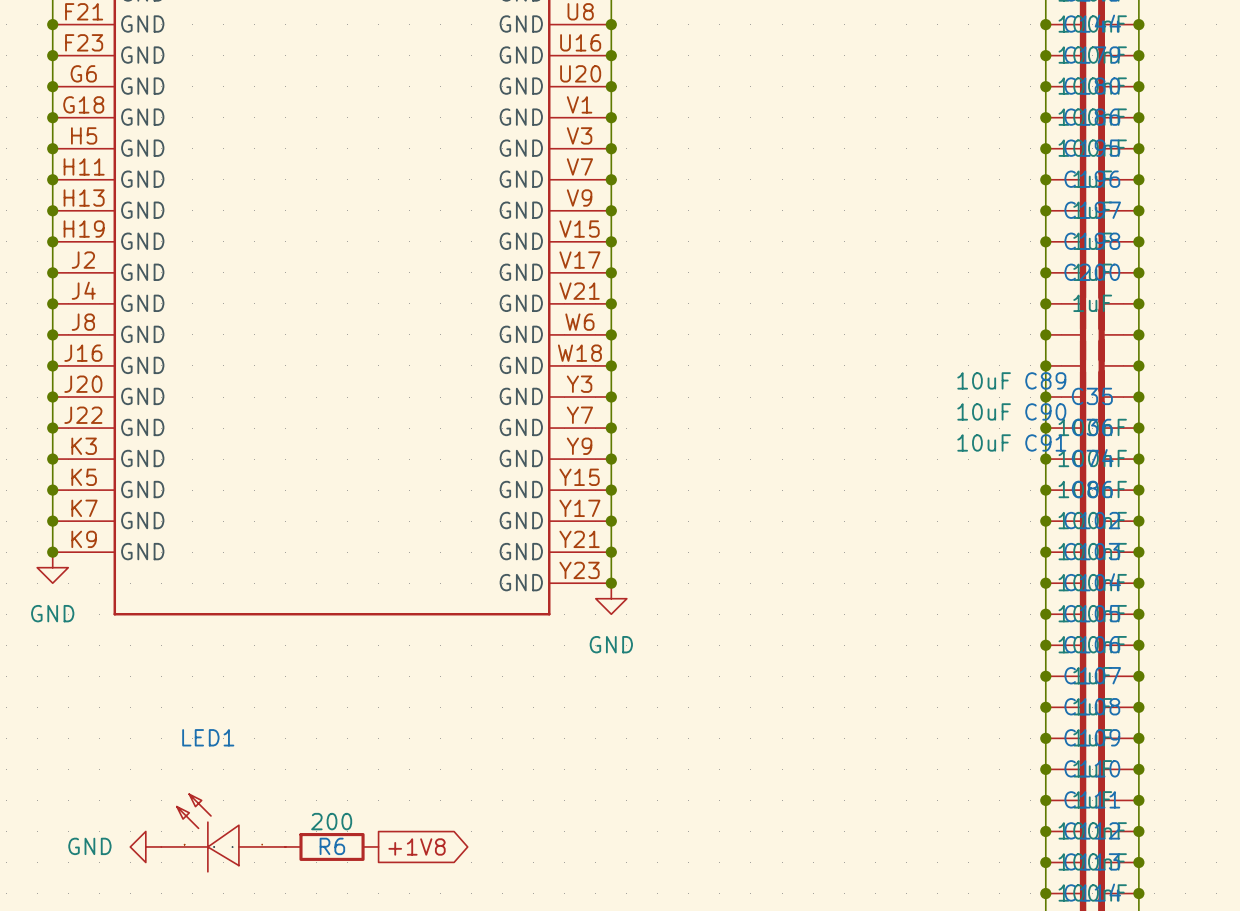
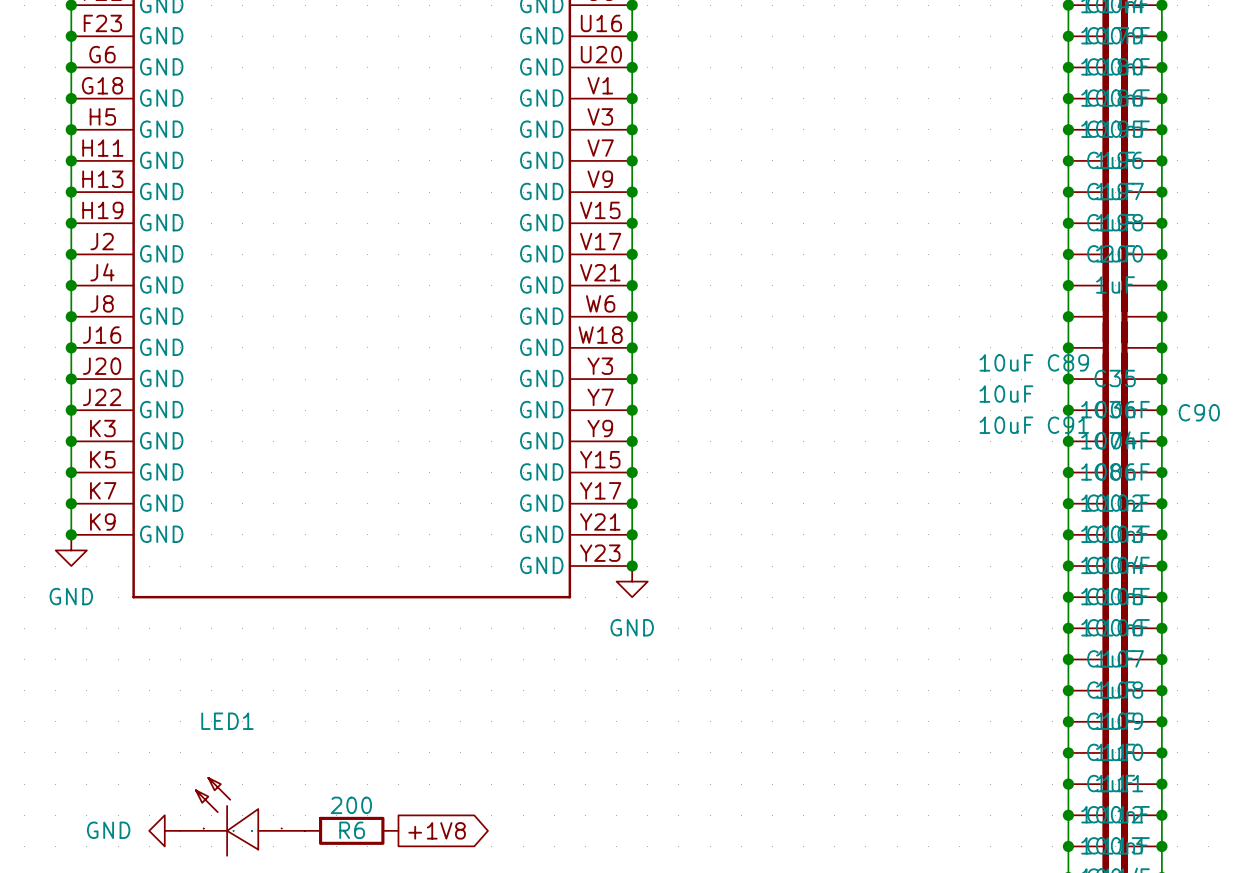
C90 name position: C90 (1045, 411) -> C90 (1199, 412)

